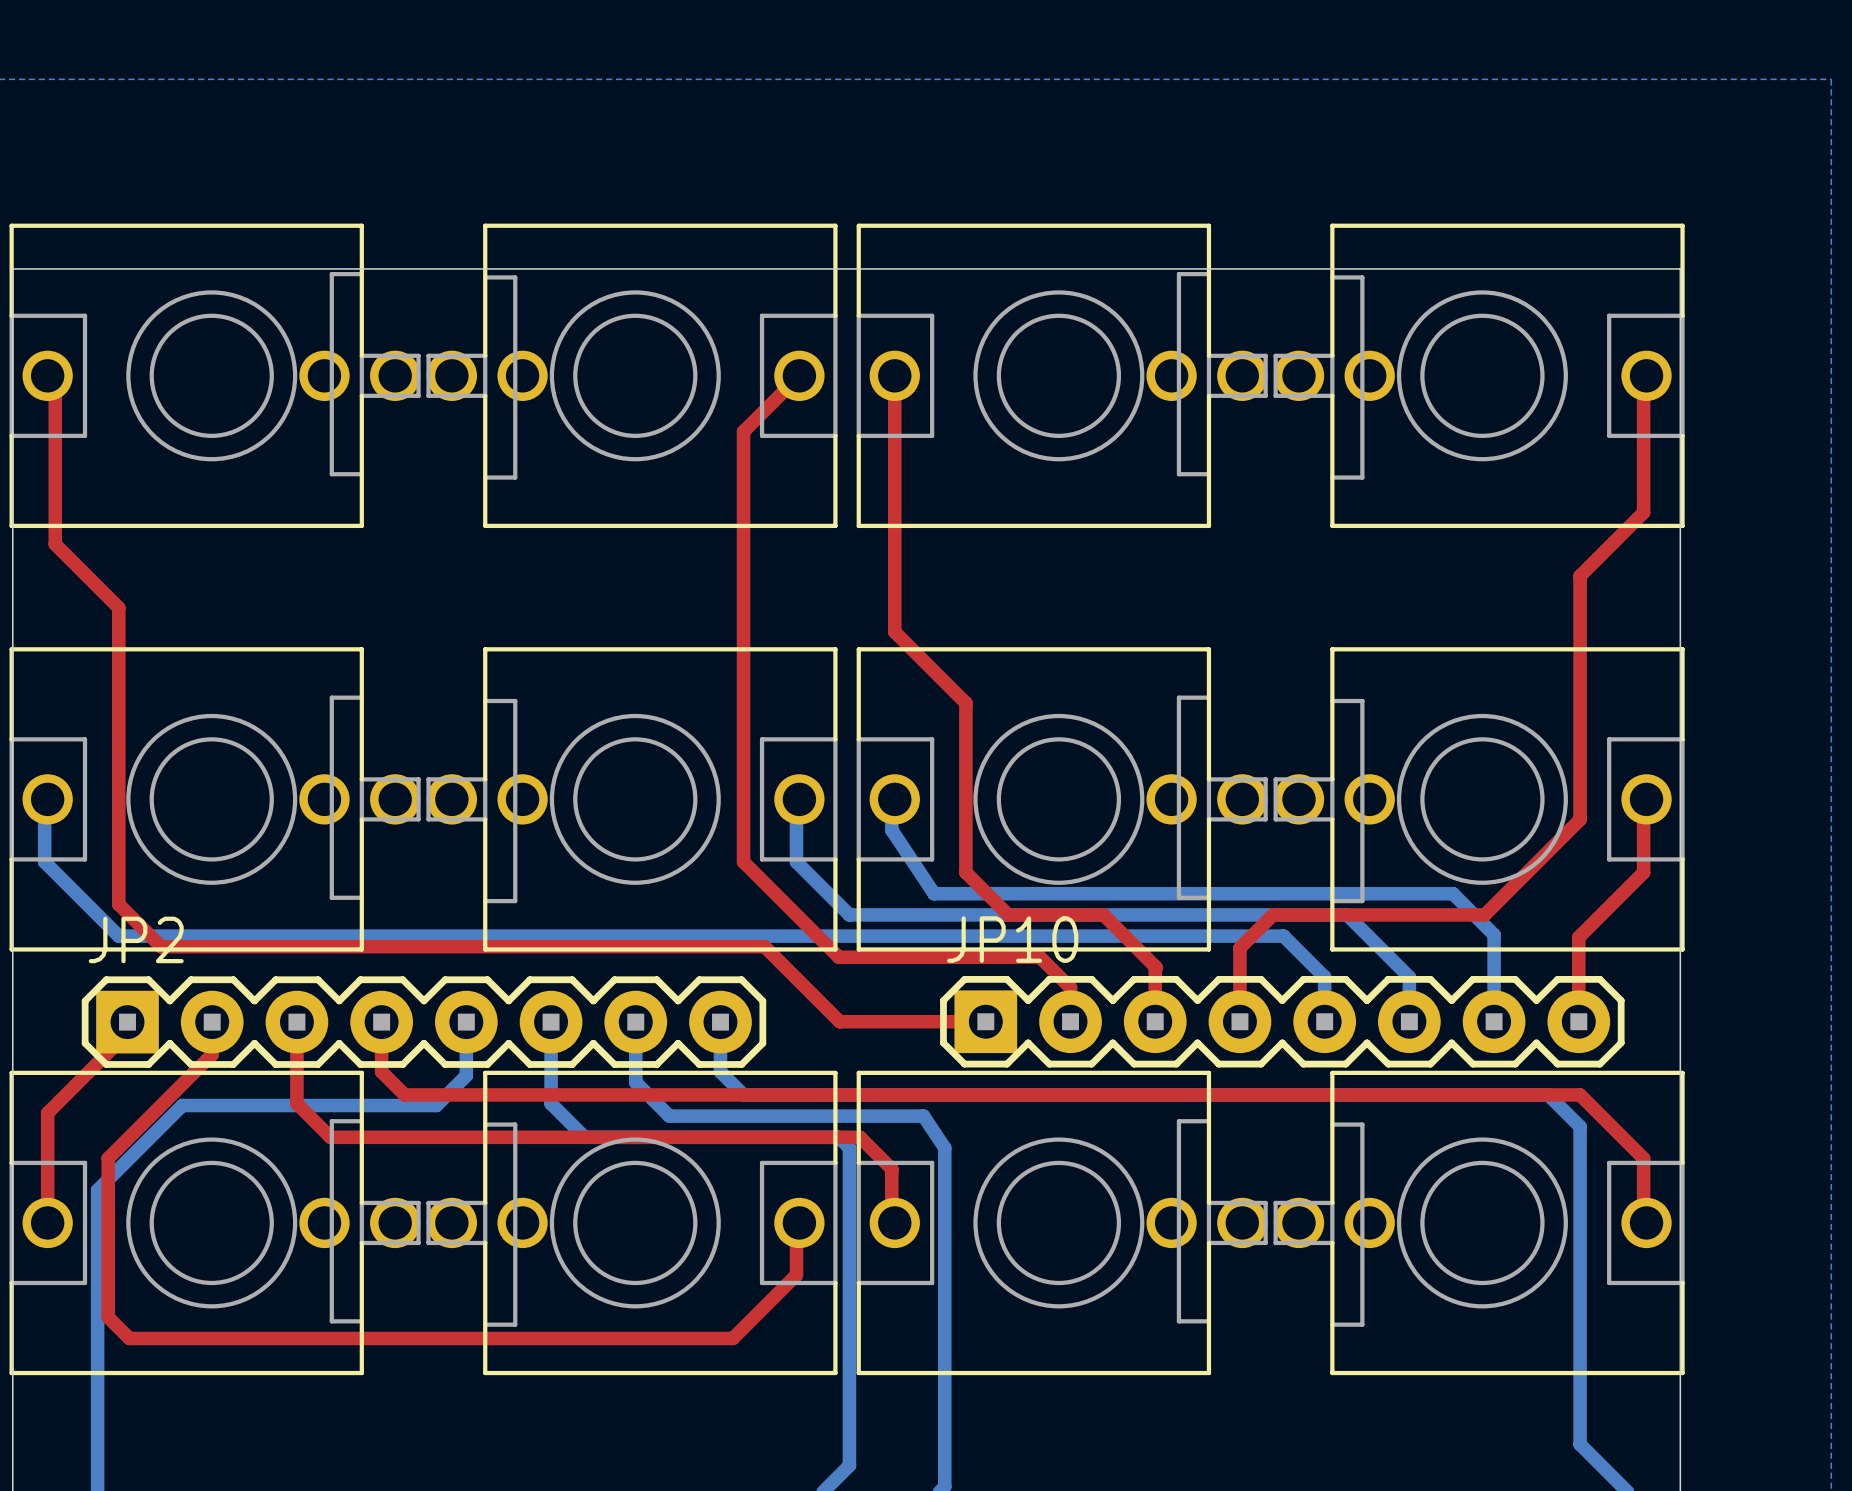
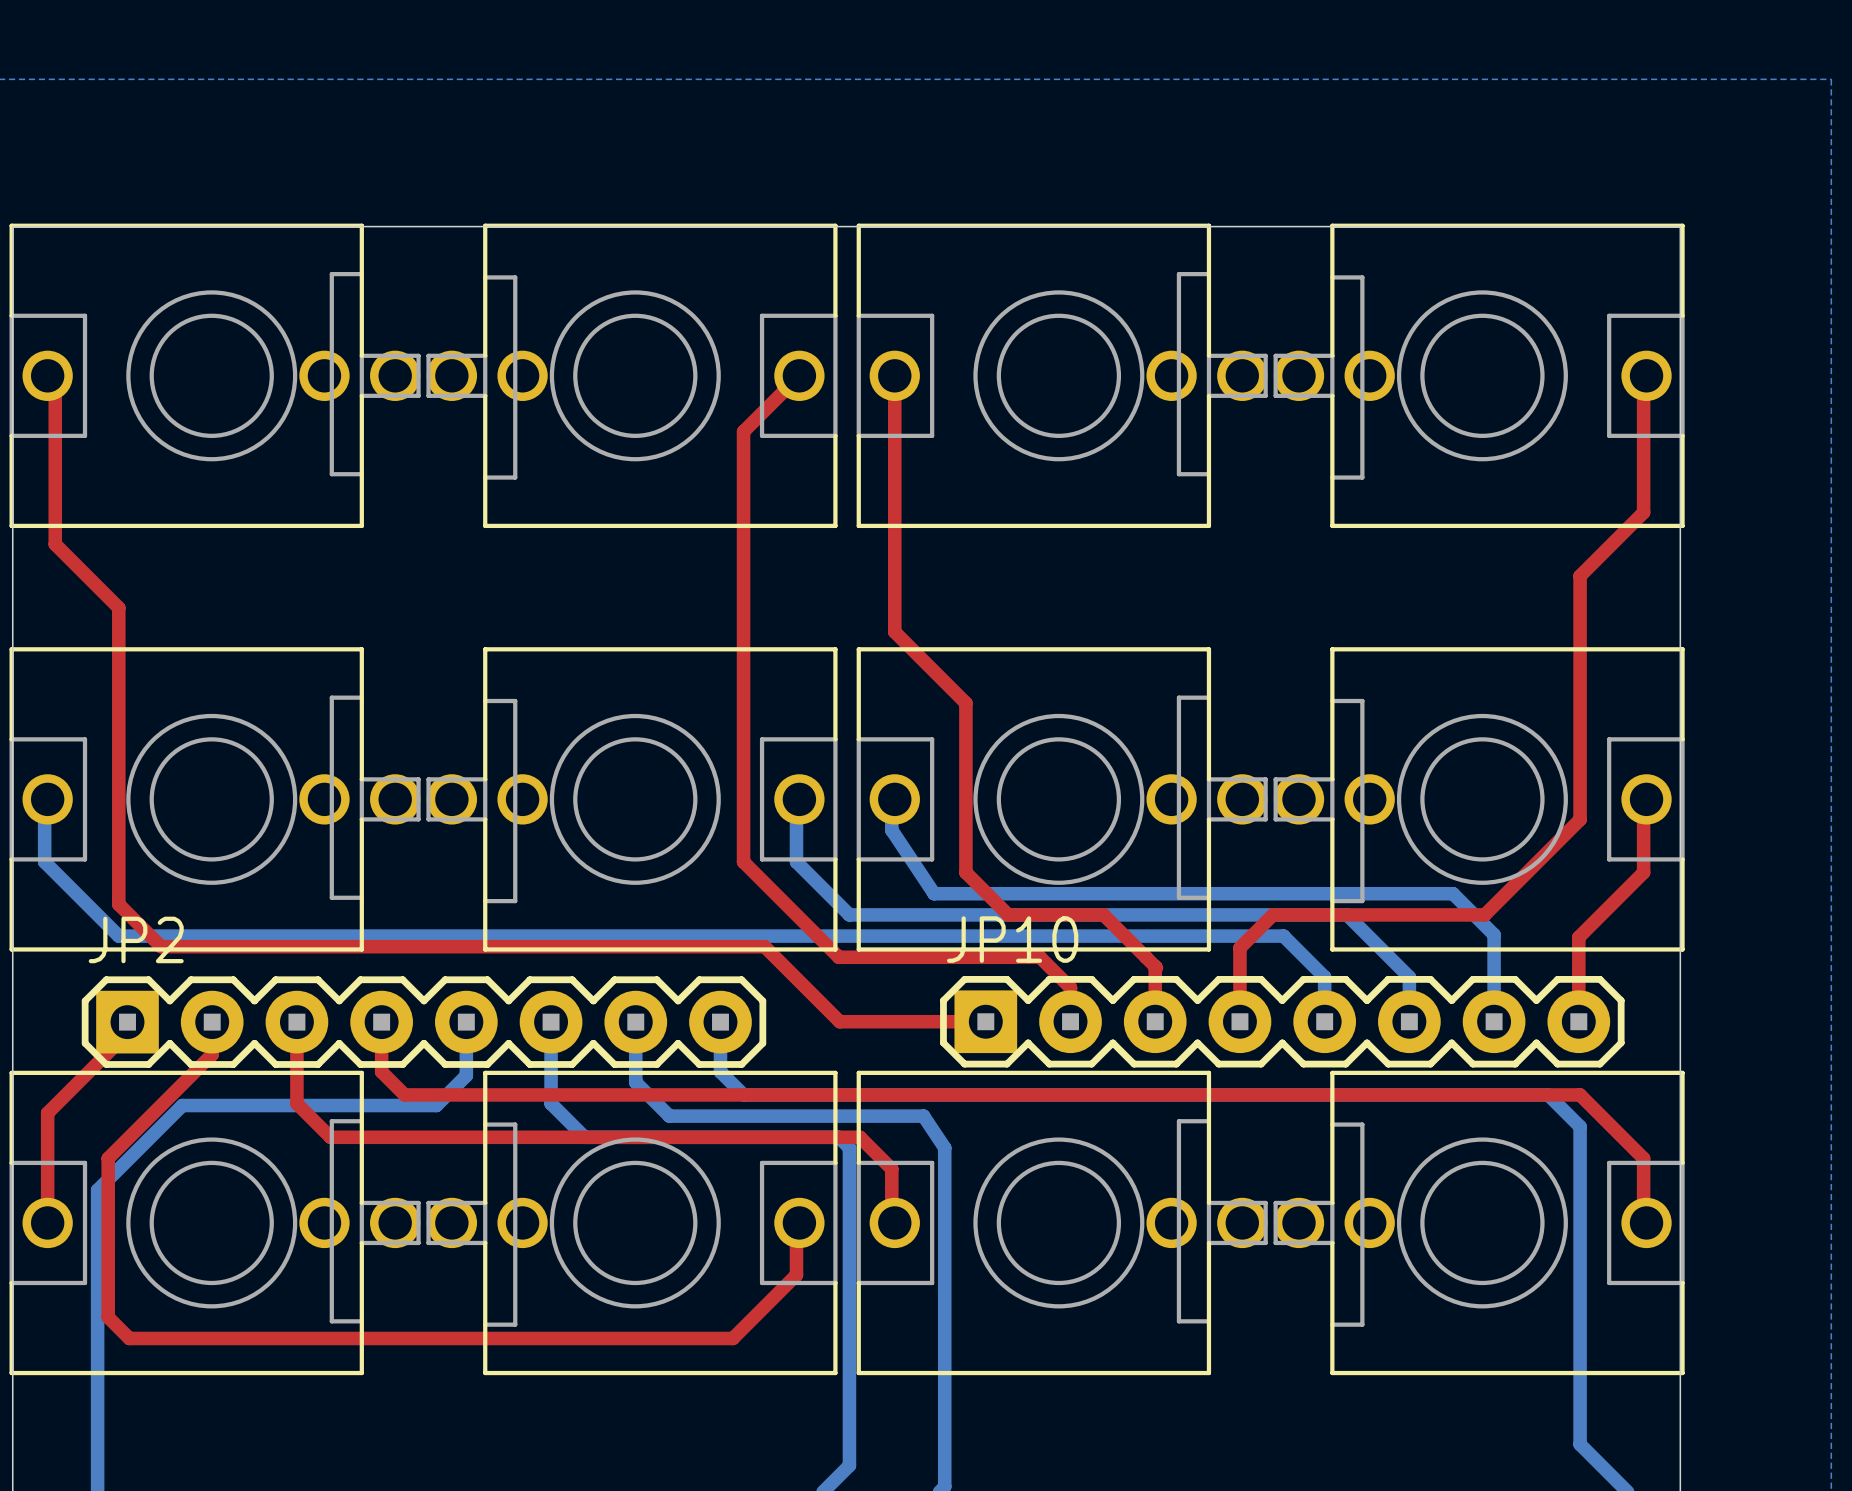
board edge: (12, 268) (1680, 268) -> (12, 268) (12, 226) (1680, 226) (1680, 268)

